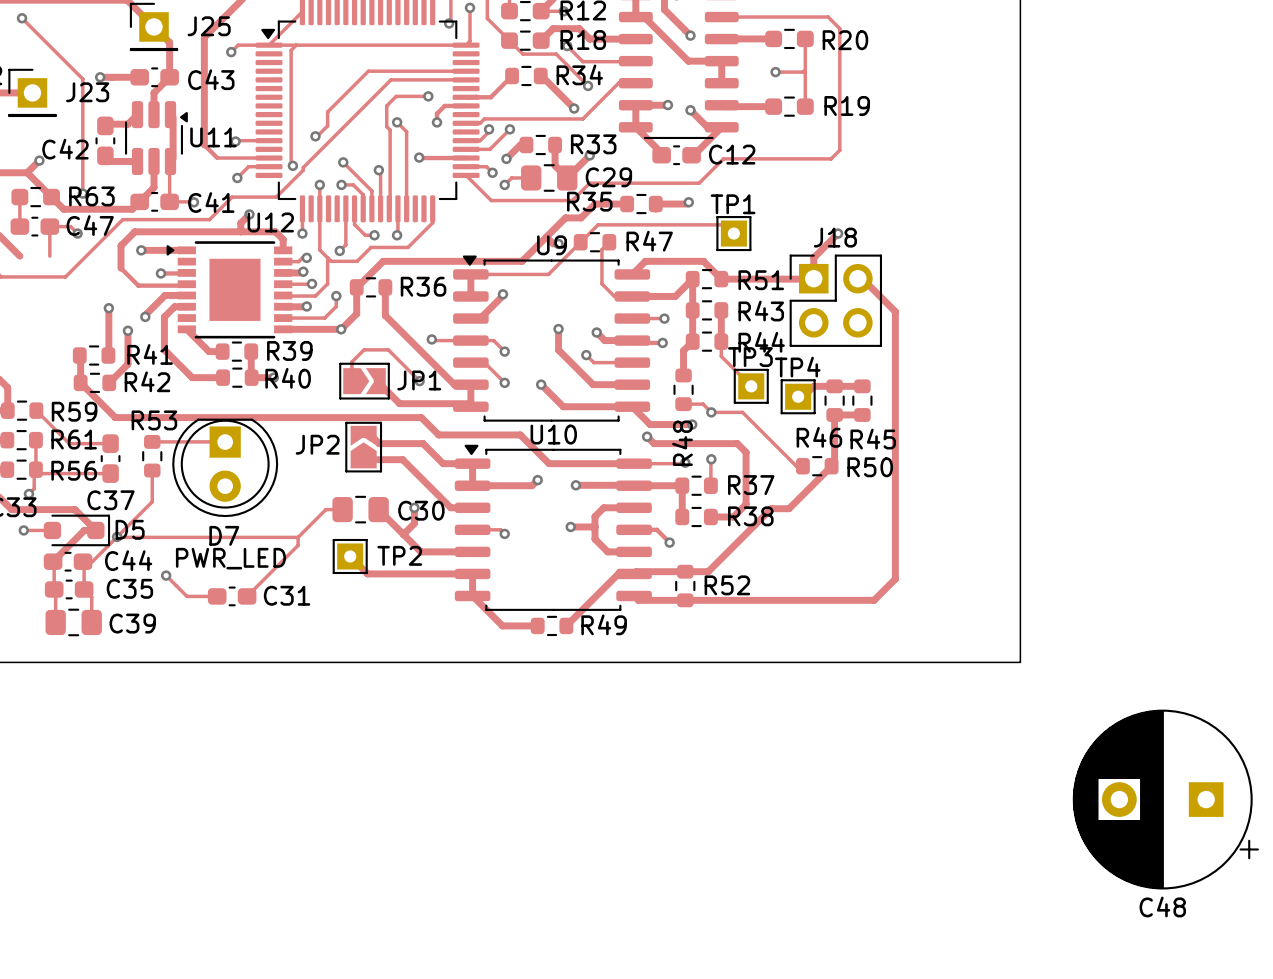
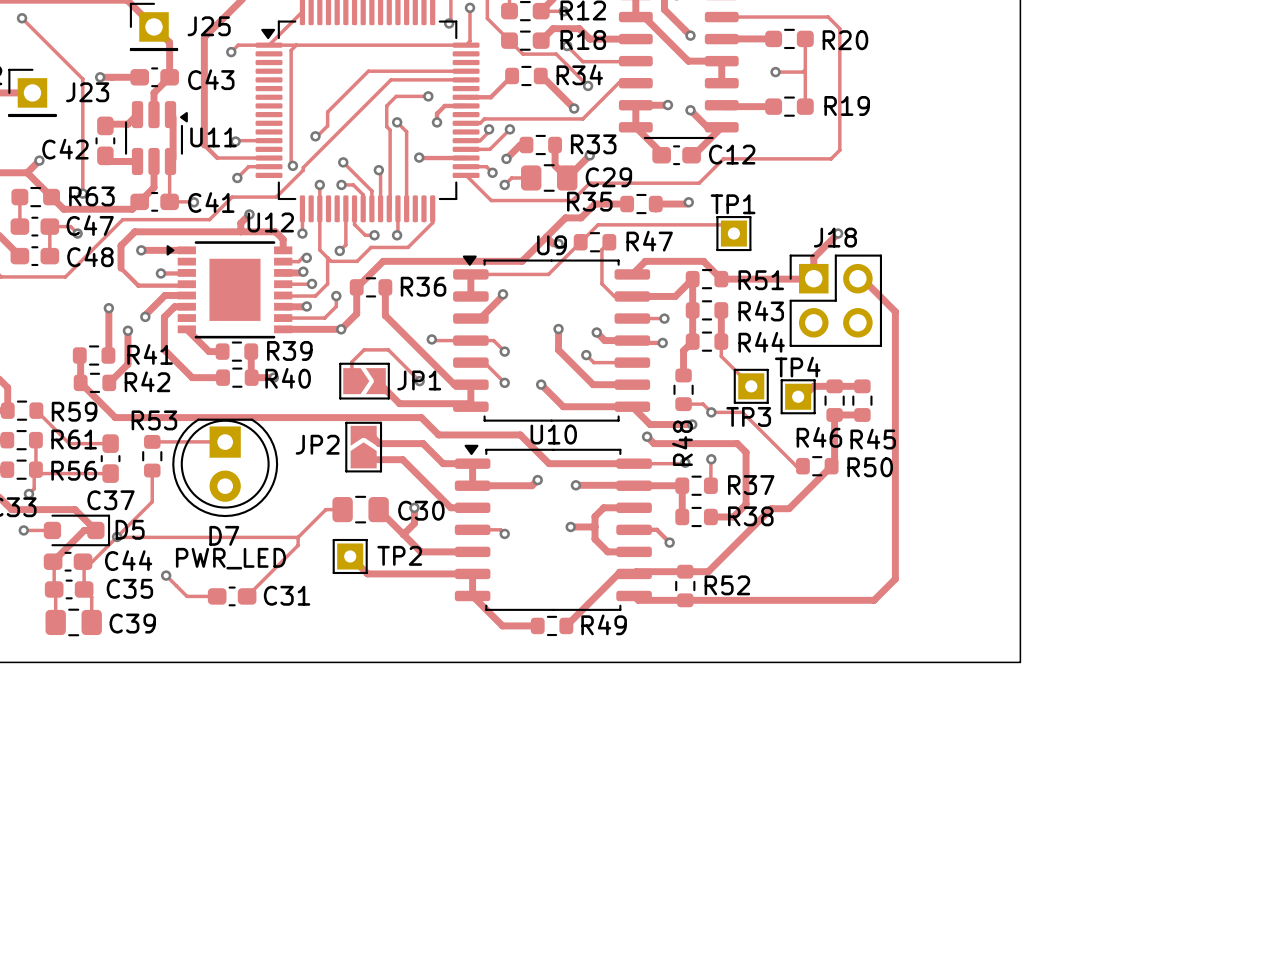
TP3 name position: TP3 (750, 357) -> TP3 (748, 416)
C48 footprint: [1072, 709, 1259, 890] -> [10, 246, 60, 267]
C48 name position: C48 (1162, 907) -> C48 (90, 256)

